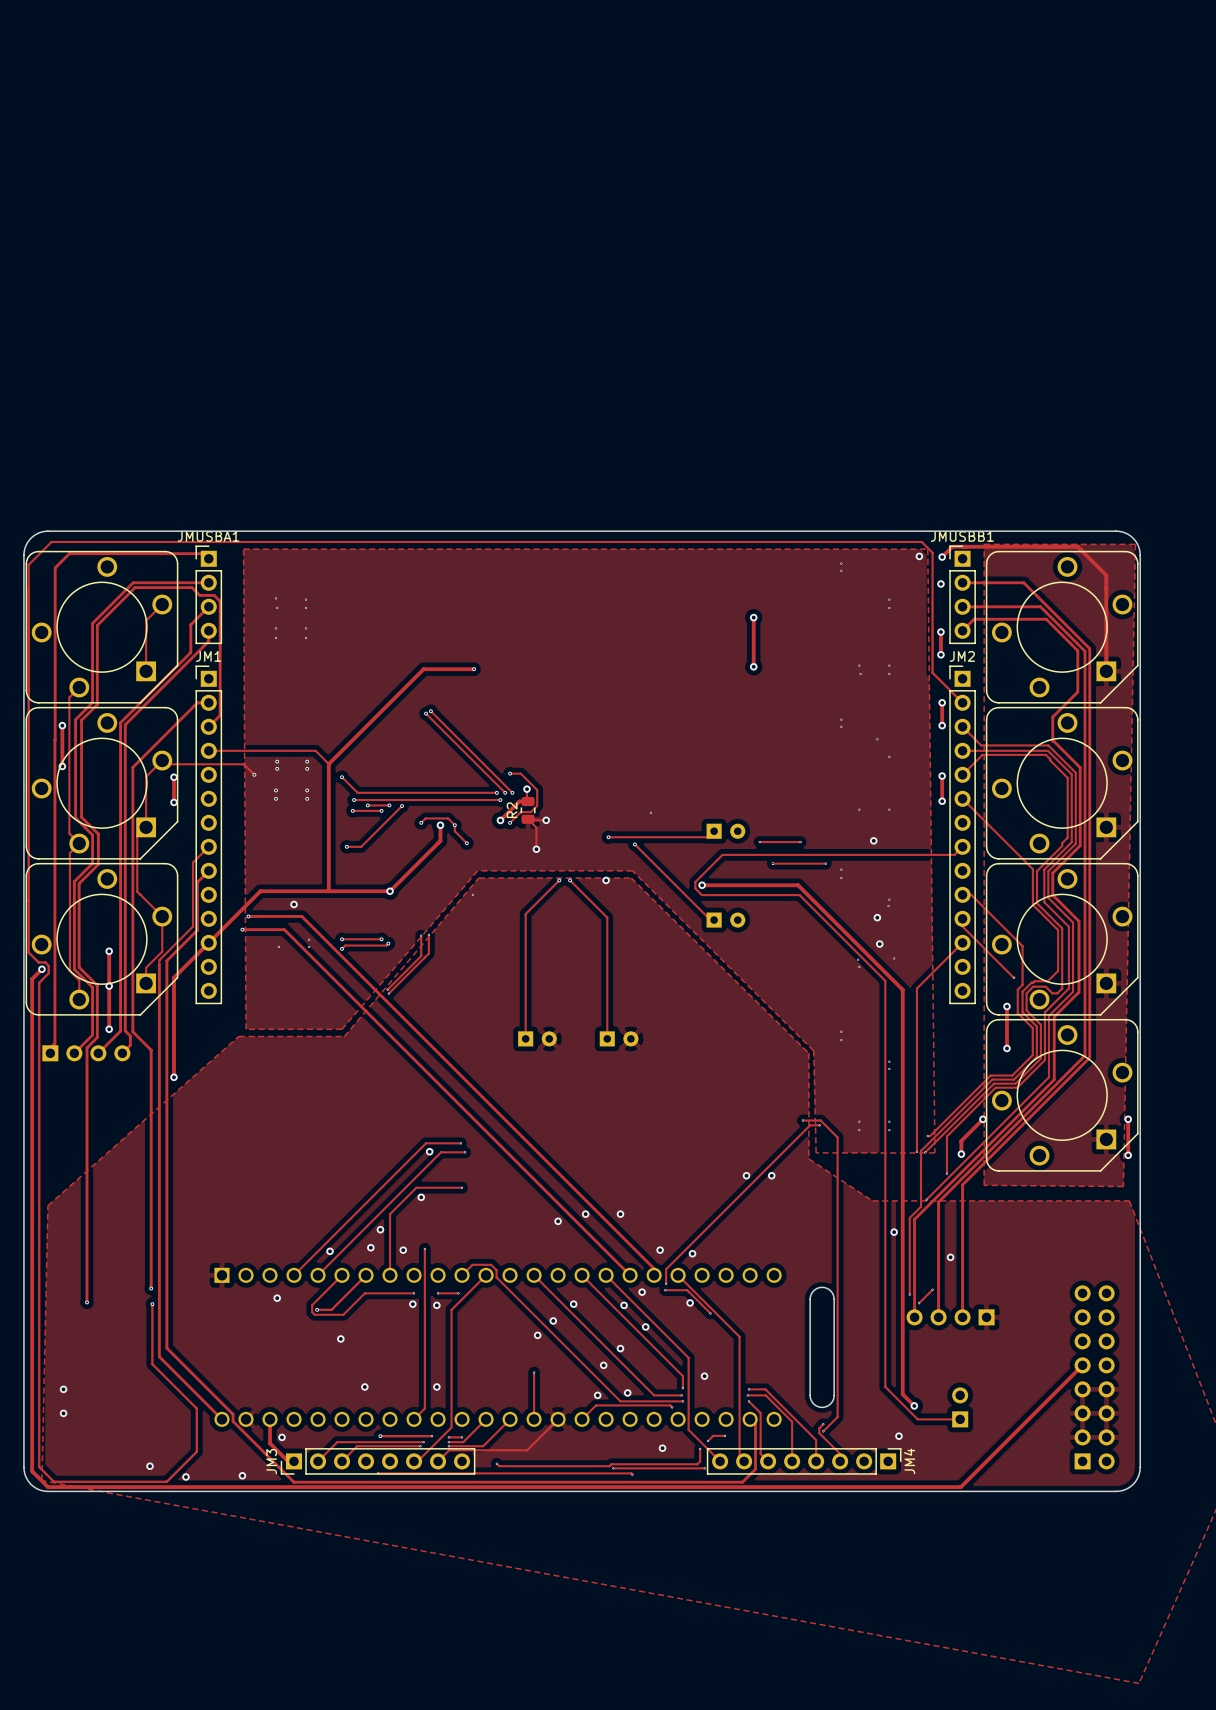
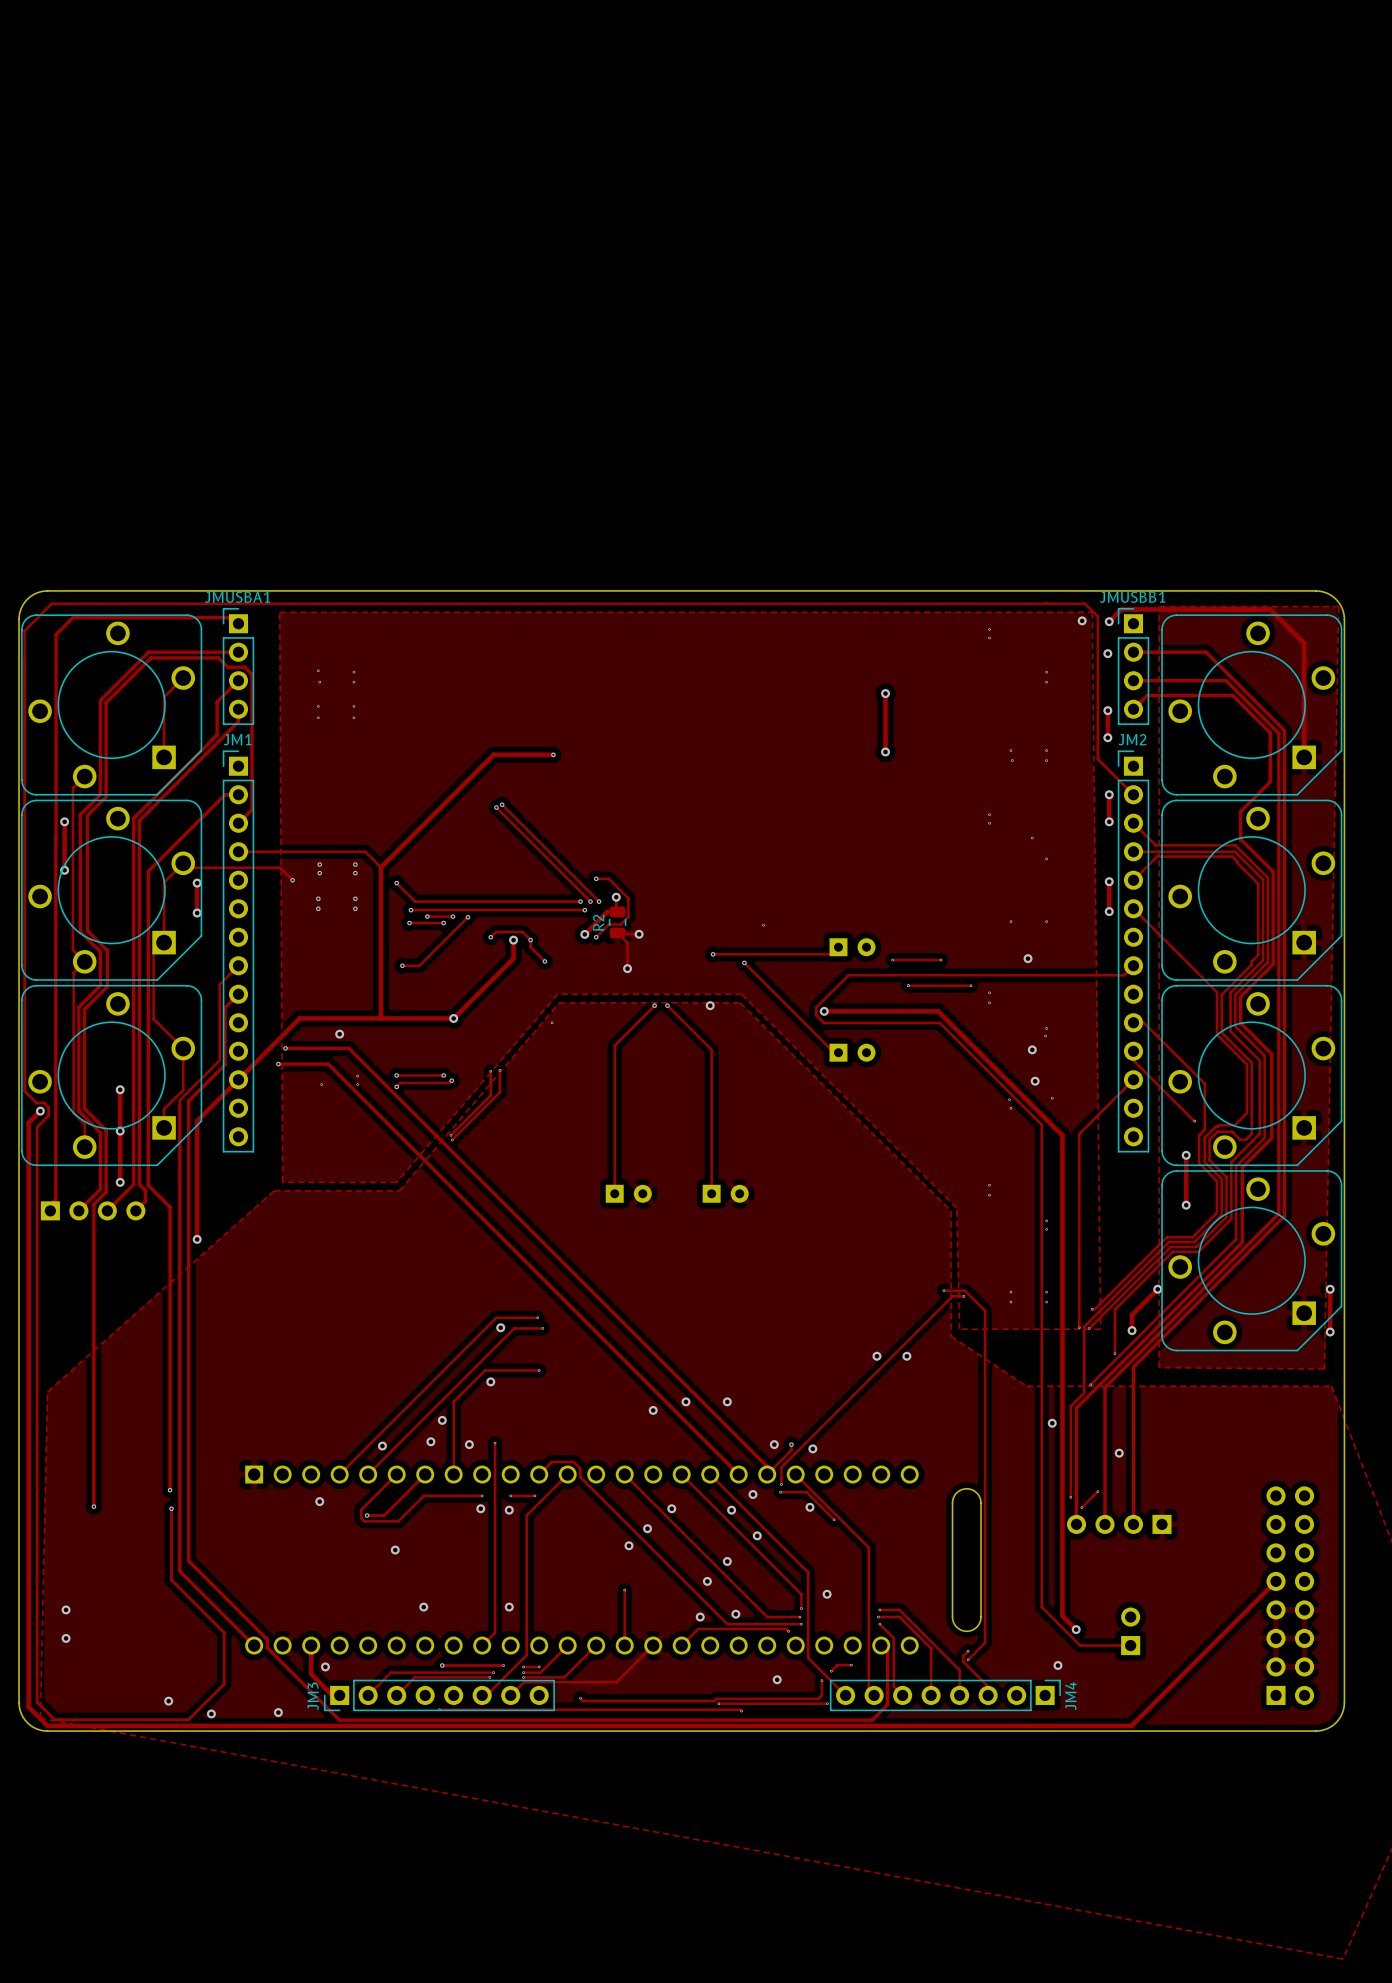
track: none -> (791, 1444) (791, 1450) (767, 1474)
via: none -> (791, 1444)

